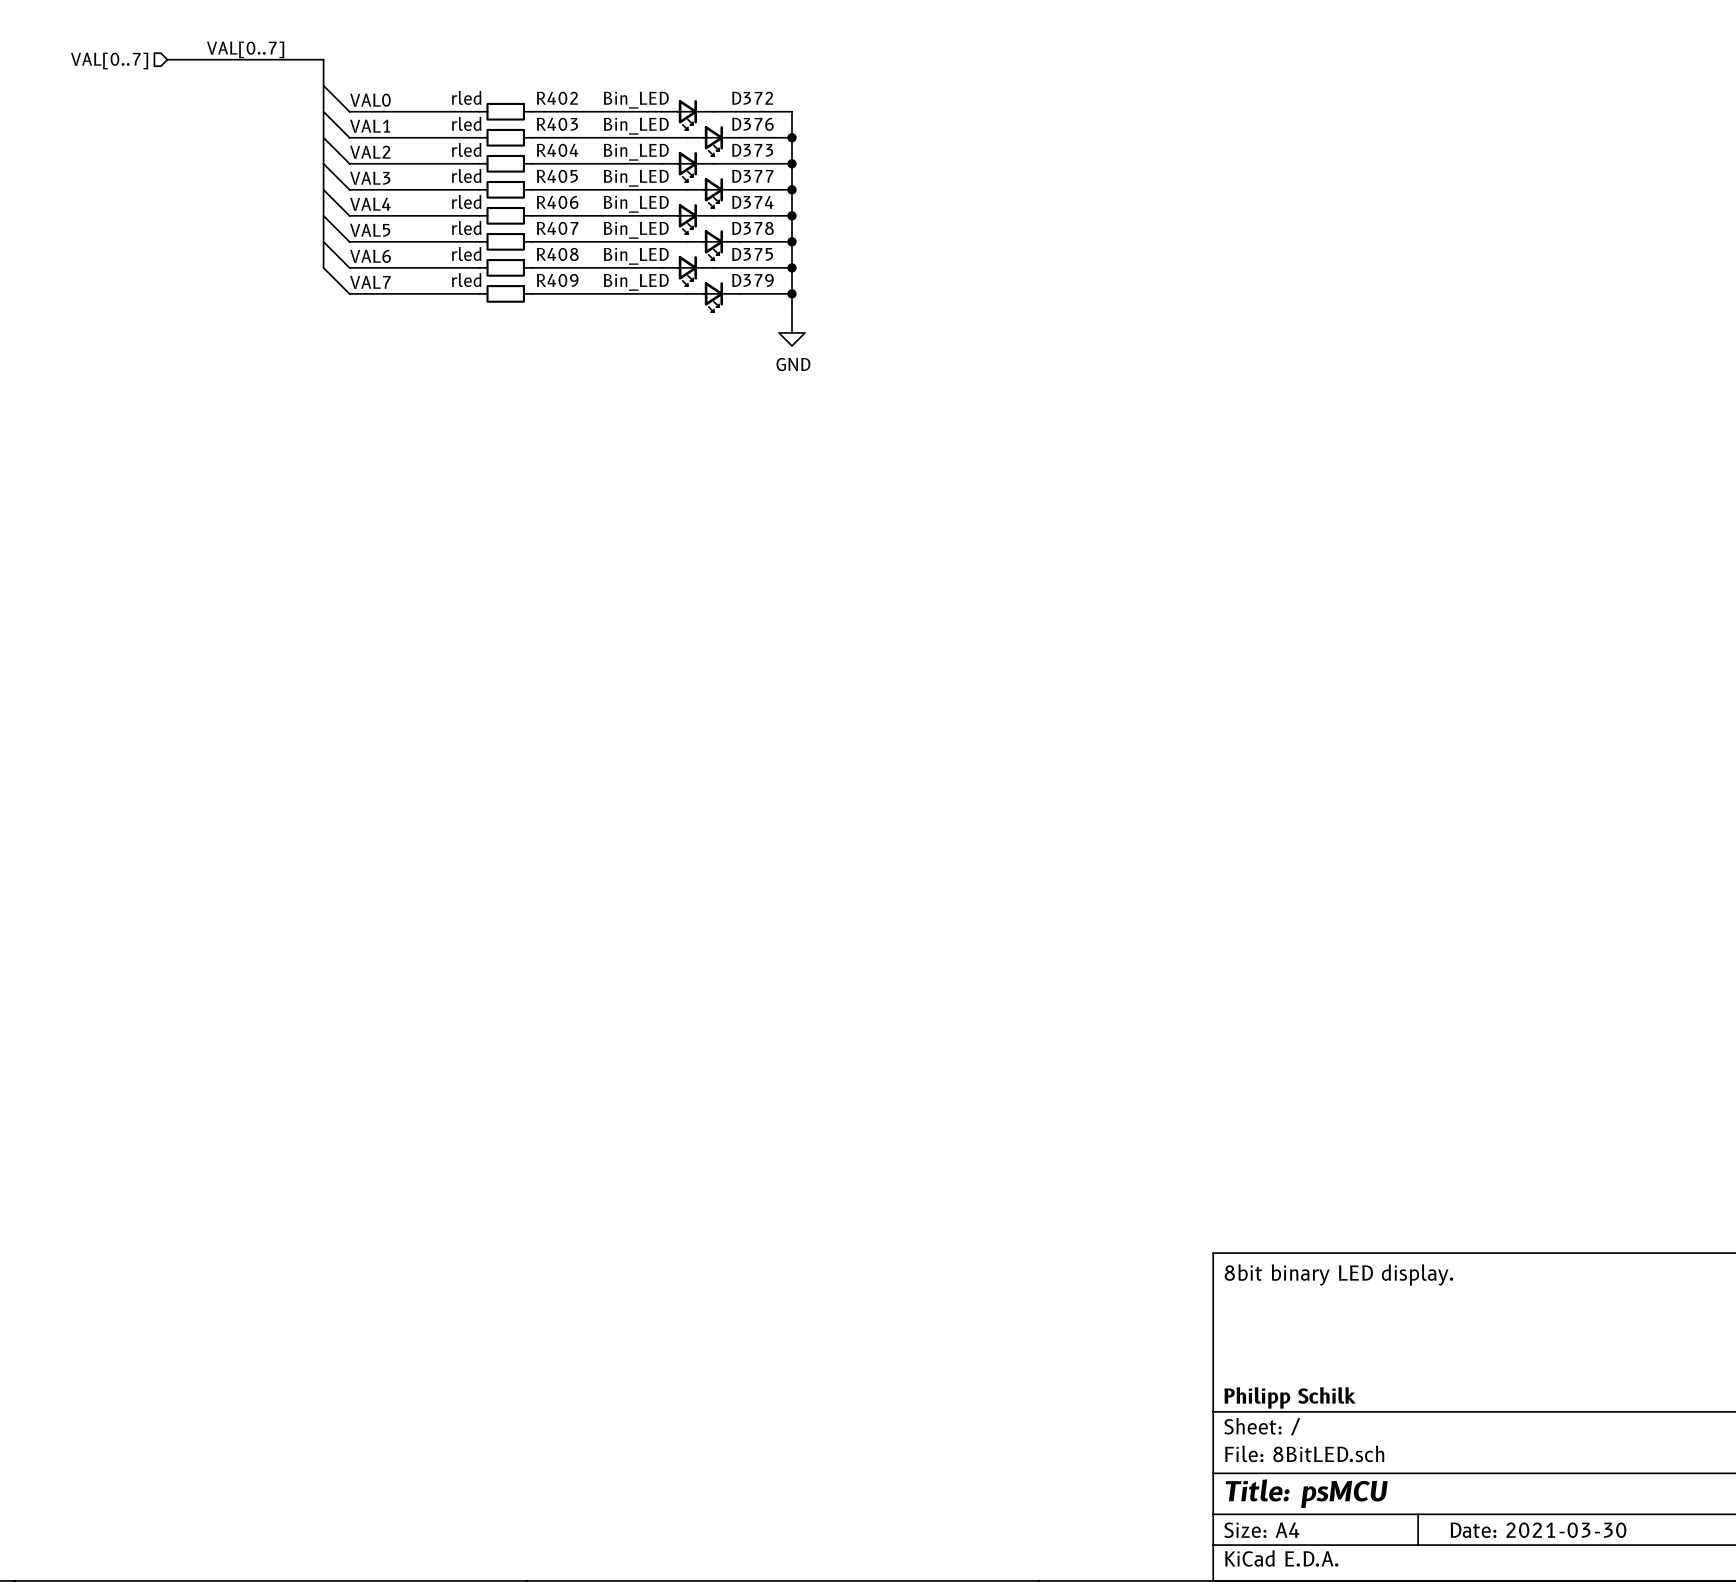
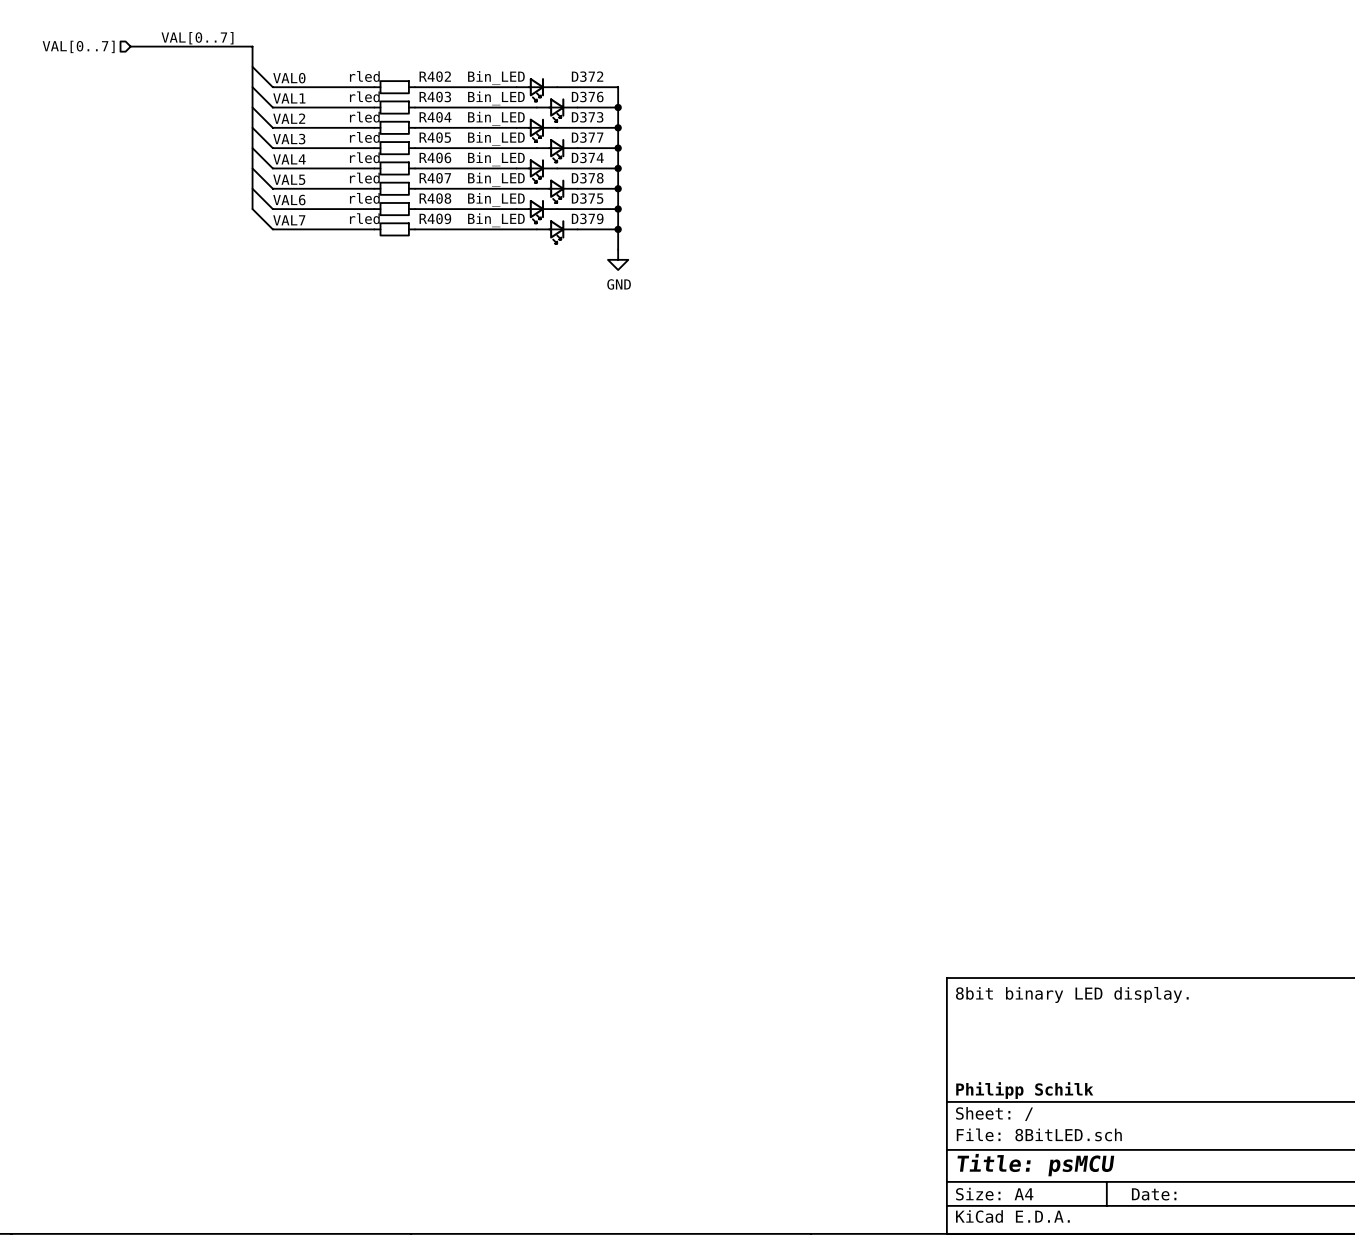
title block: Date: 2021-03-30 (1538, 1530) -> Date: (1154, 1194)

